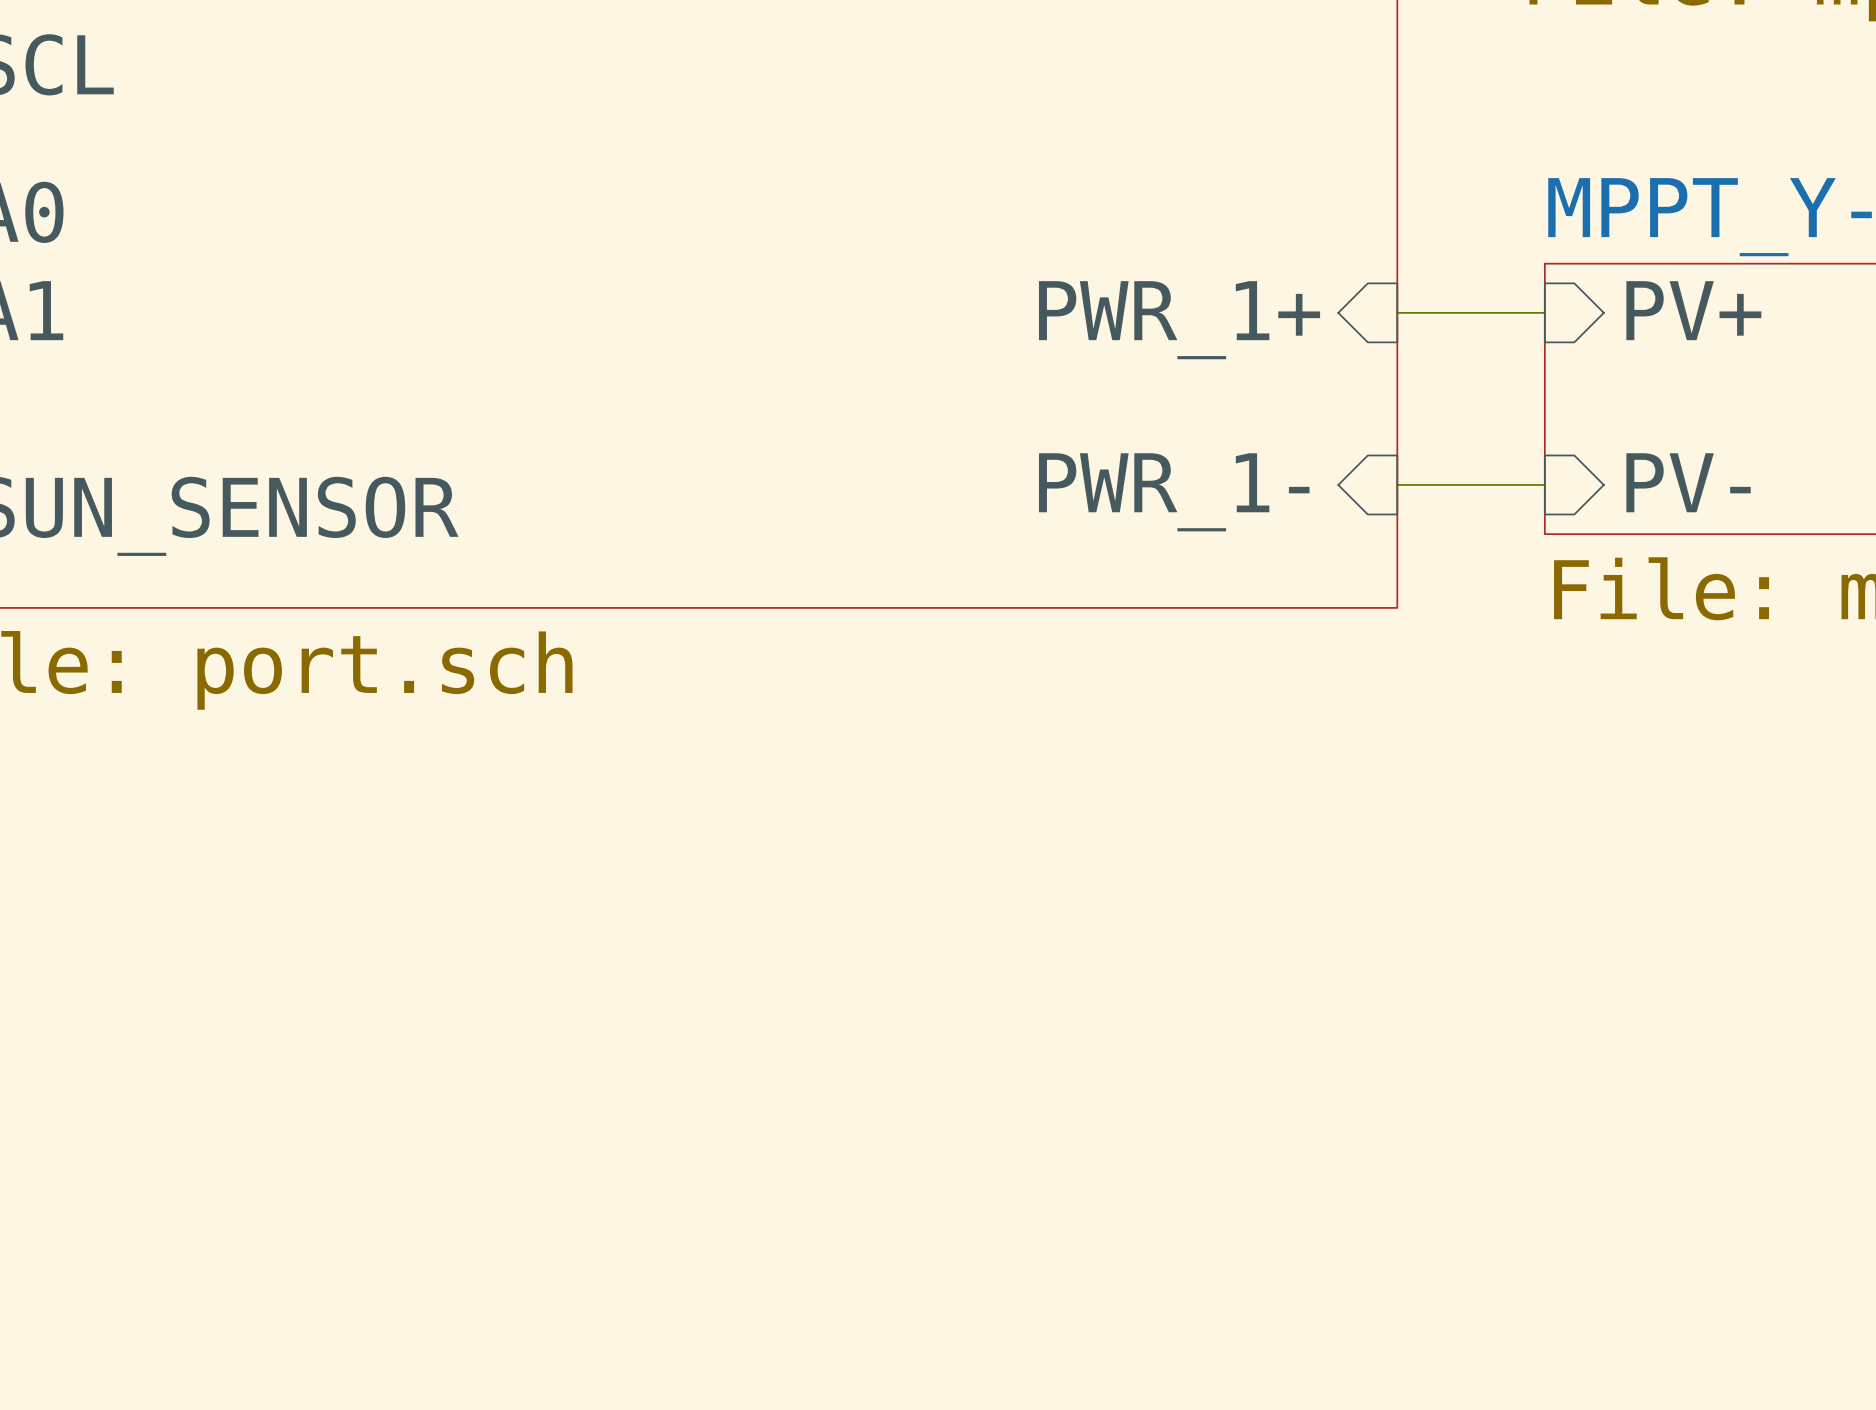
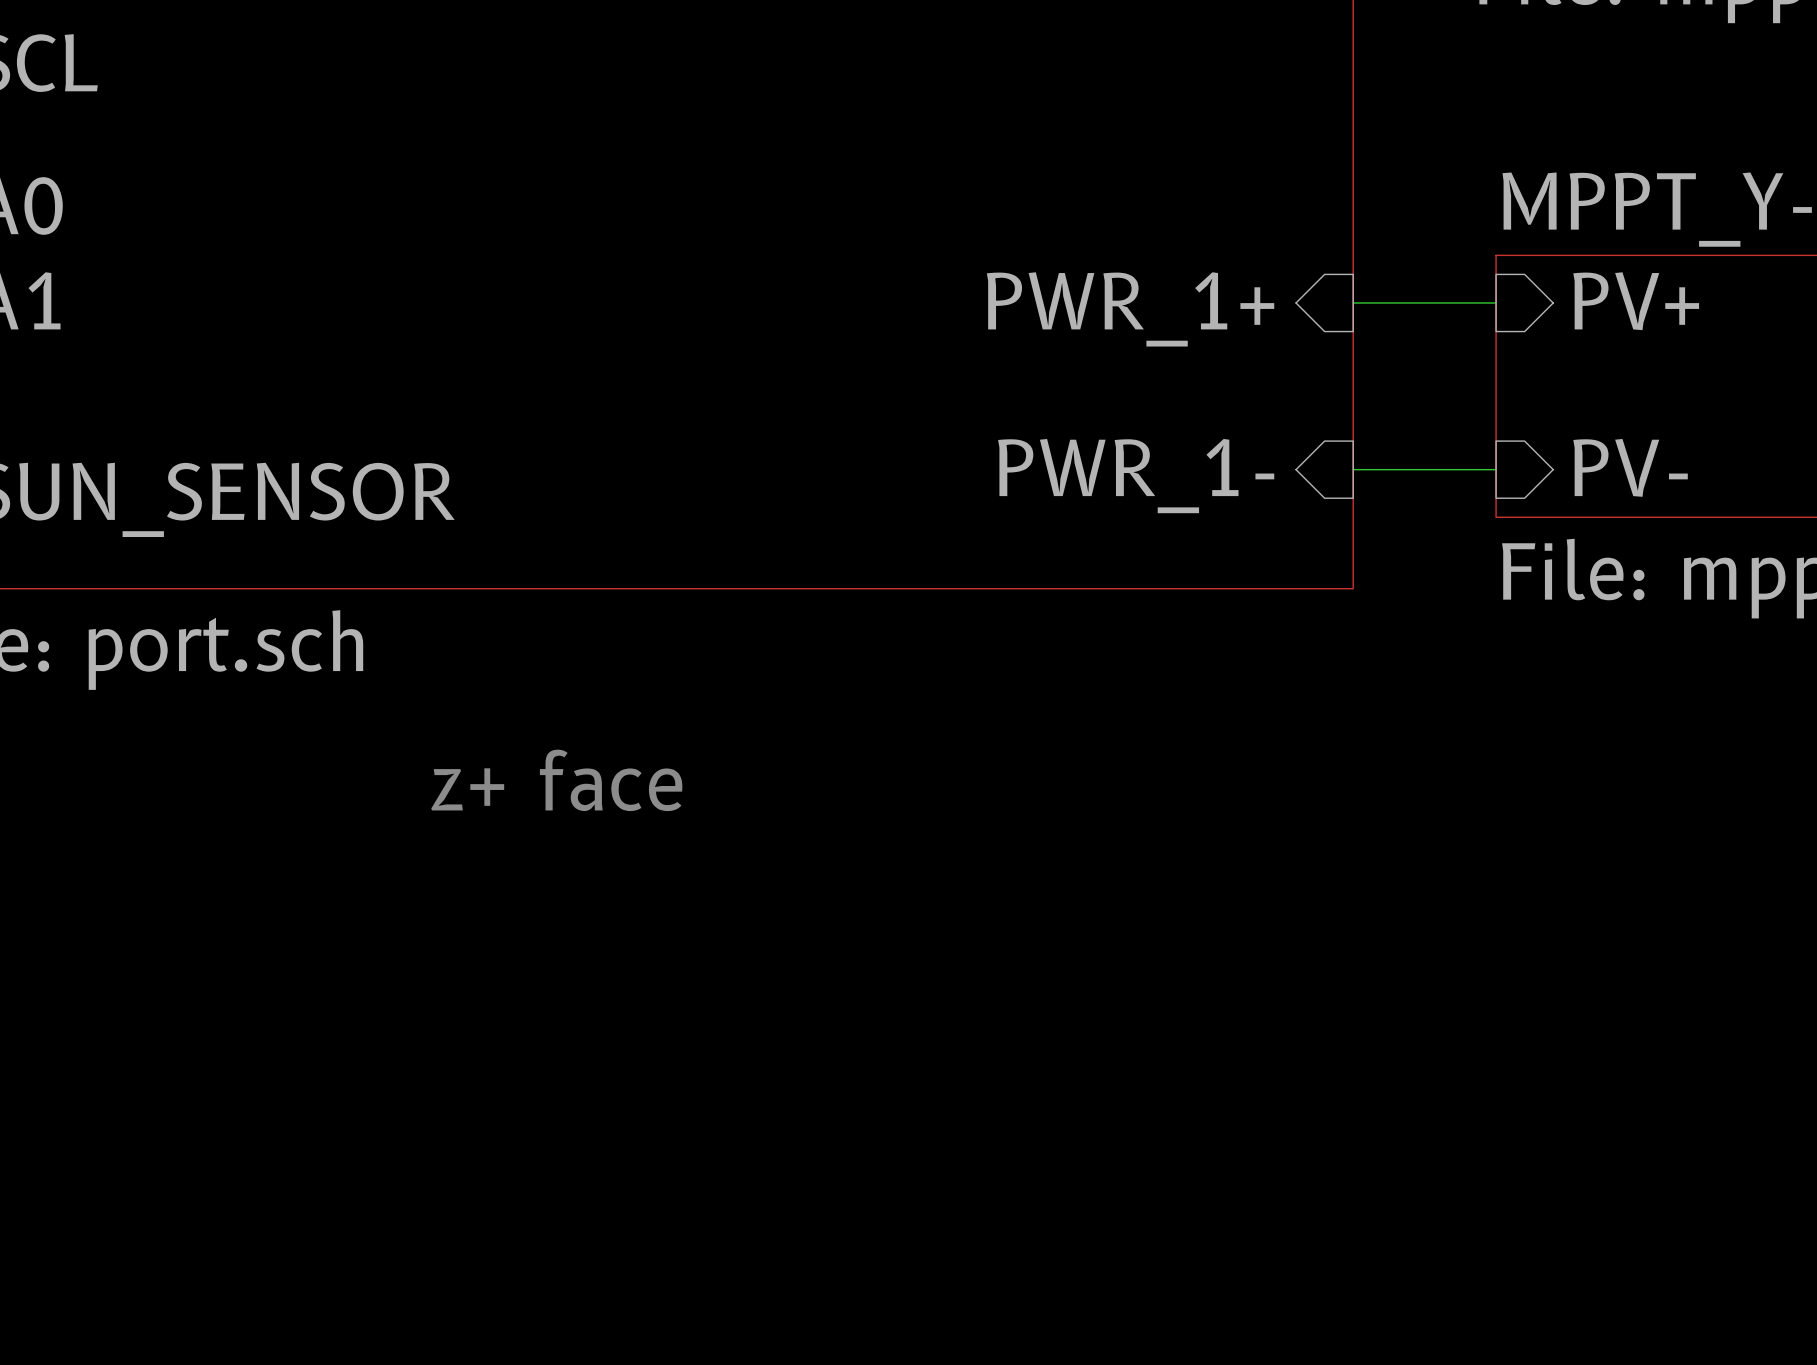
text: none -> z+ face (556, 780)

